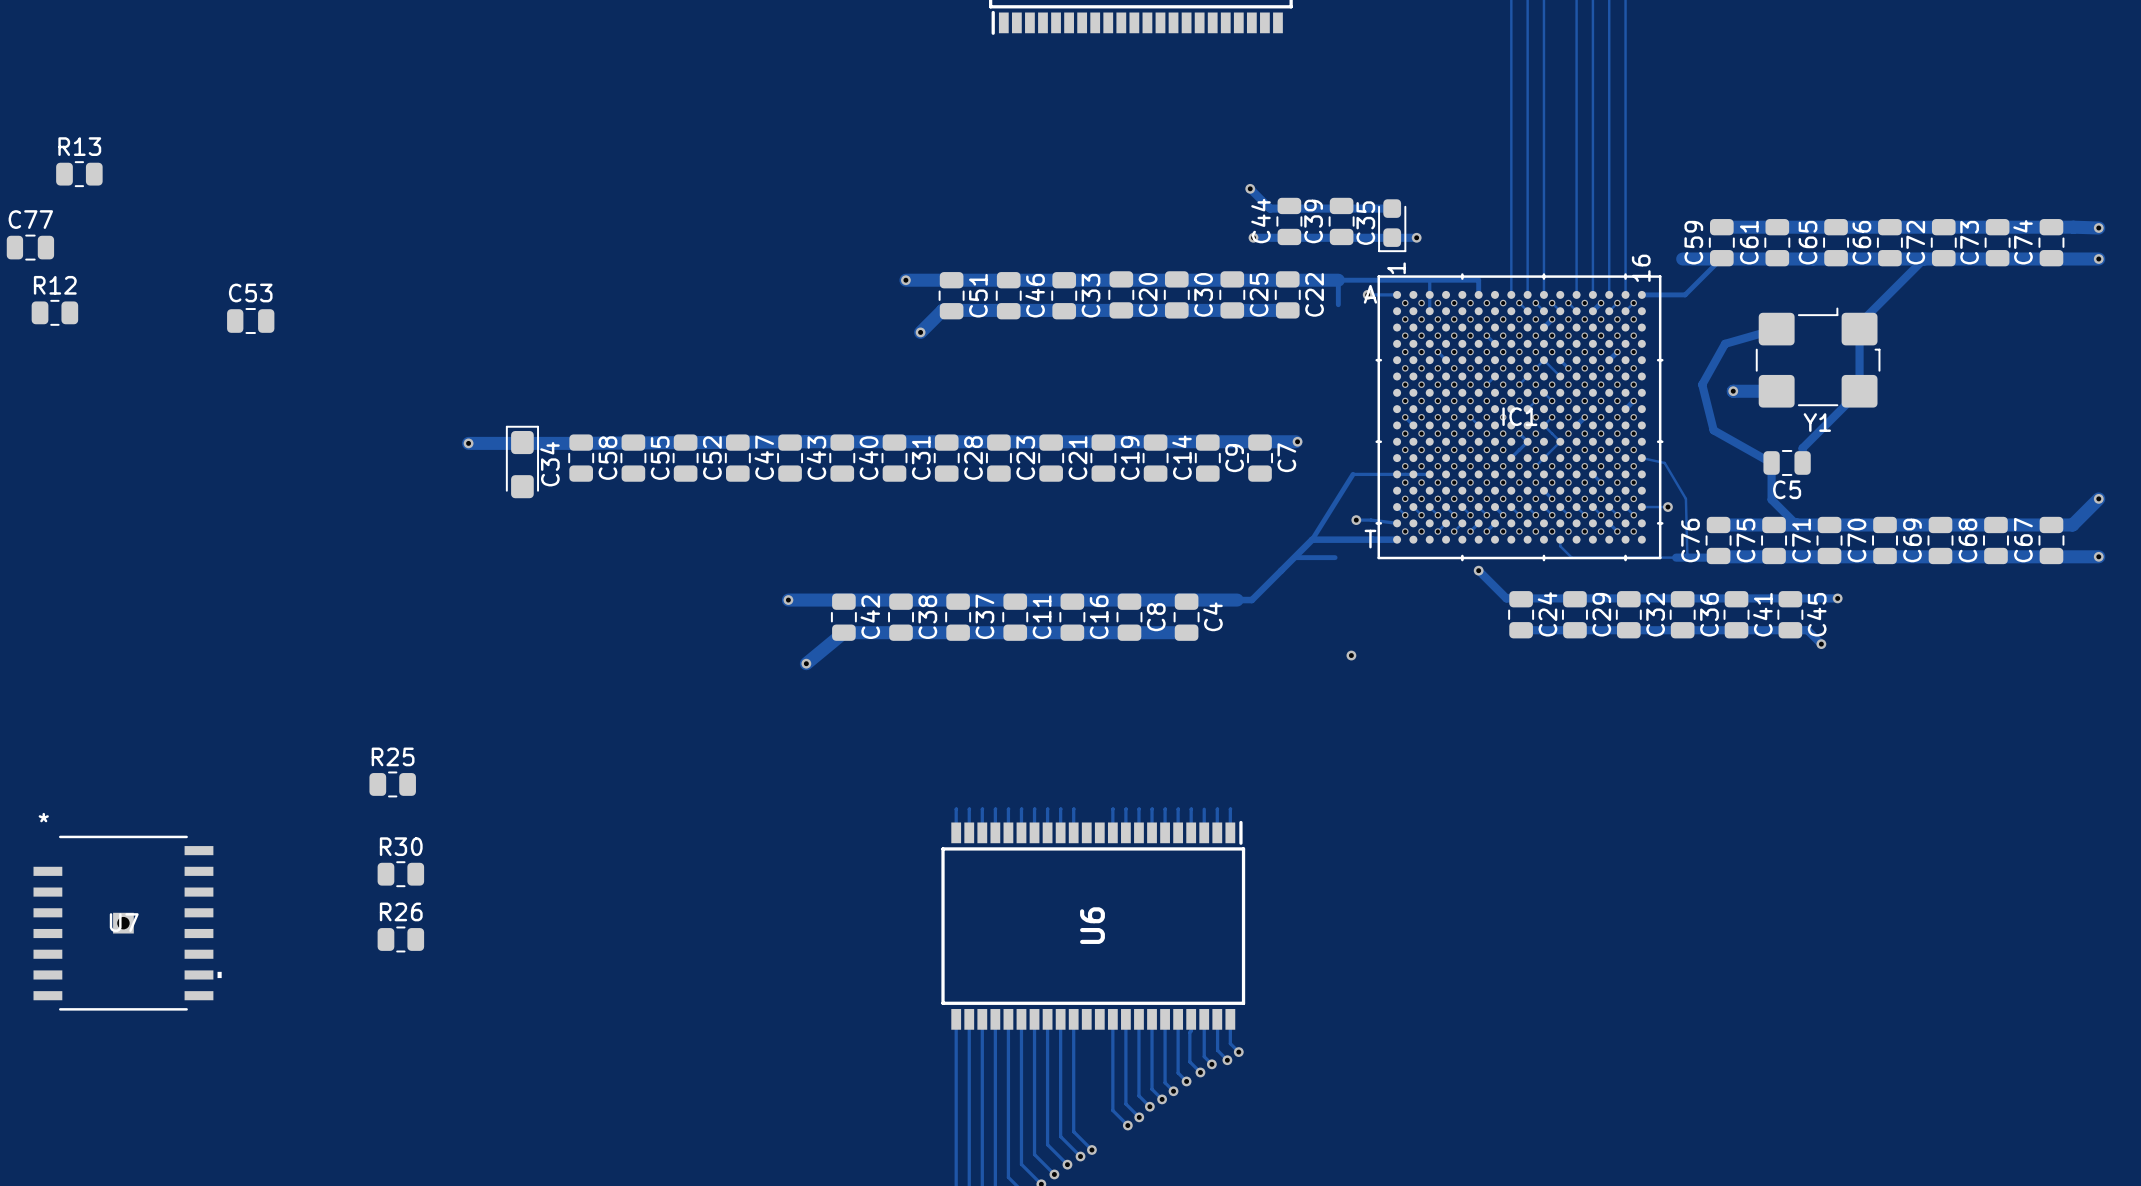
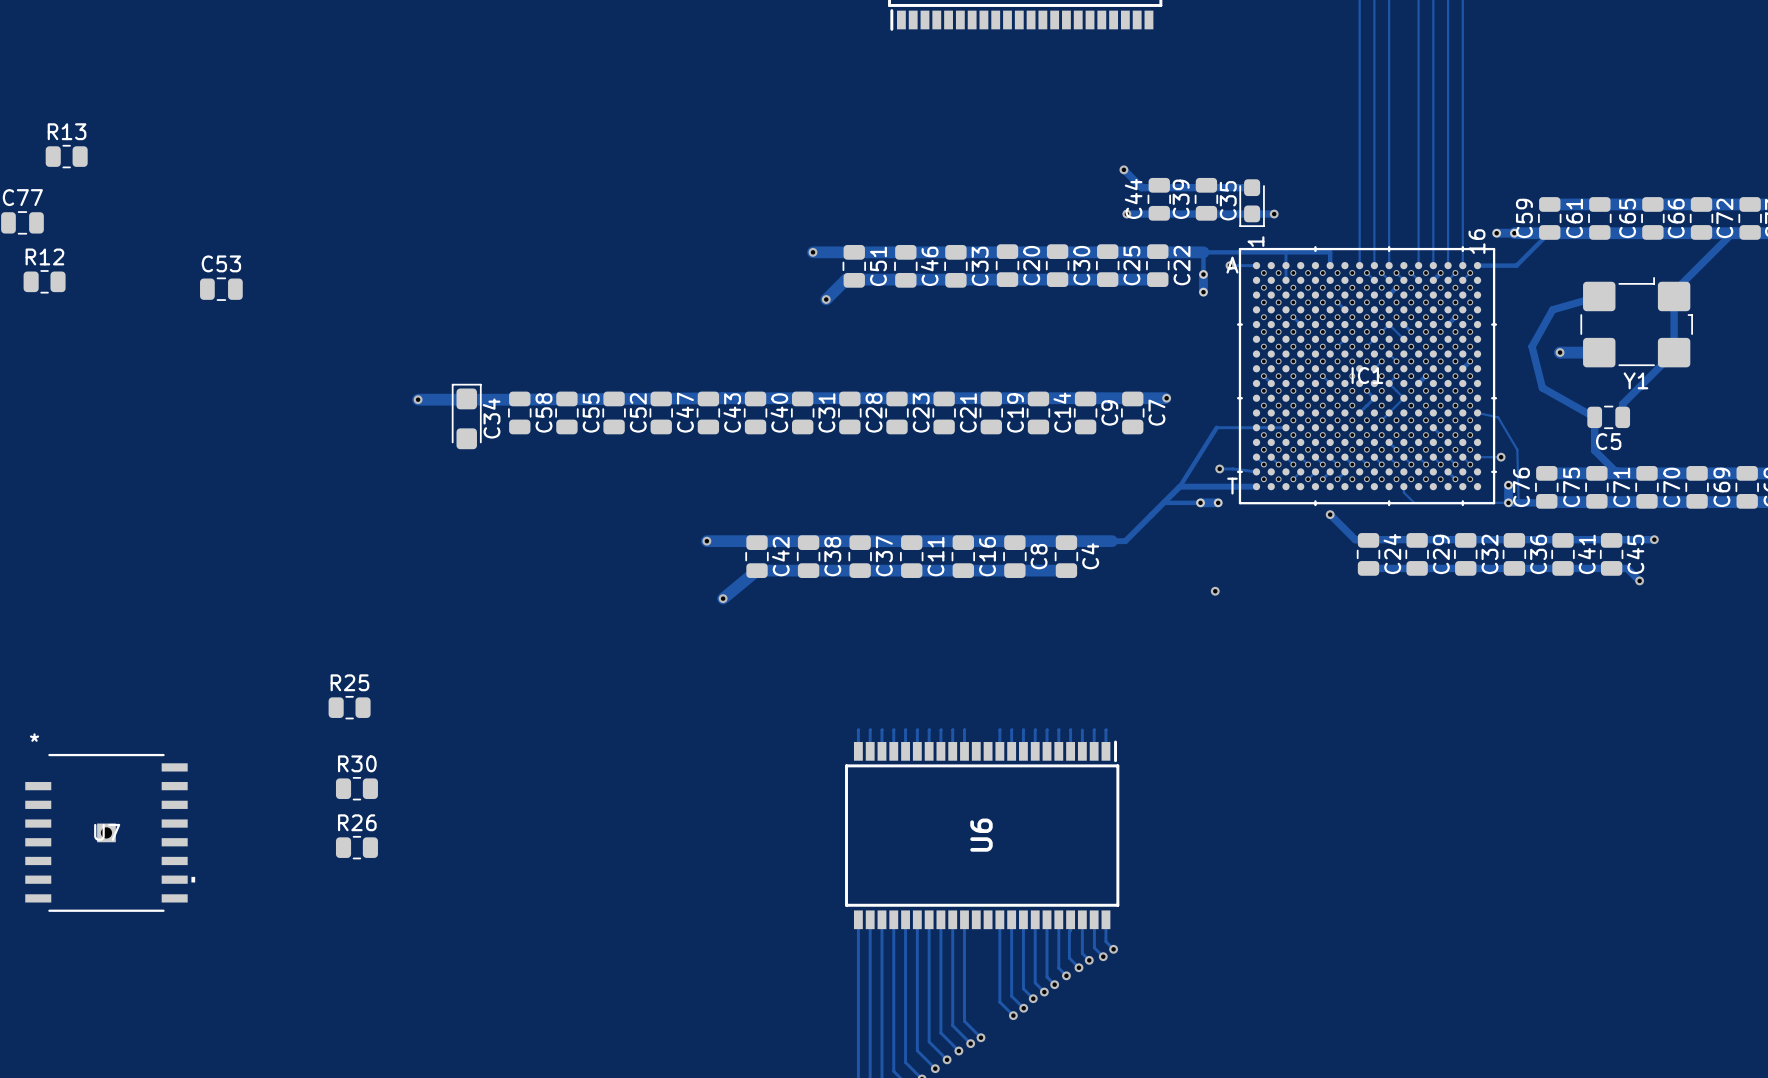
part: none -> (1505, 233)
part: none -> (1203, 283)
part: none -> (1508, 494)
part: none -> (1209, 502)

